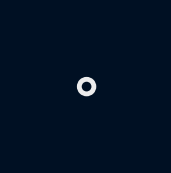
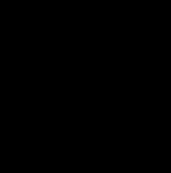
via: (86, 86) -> none

